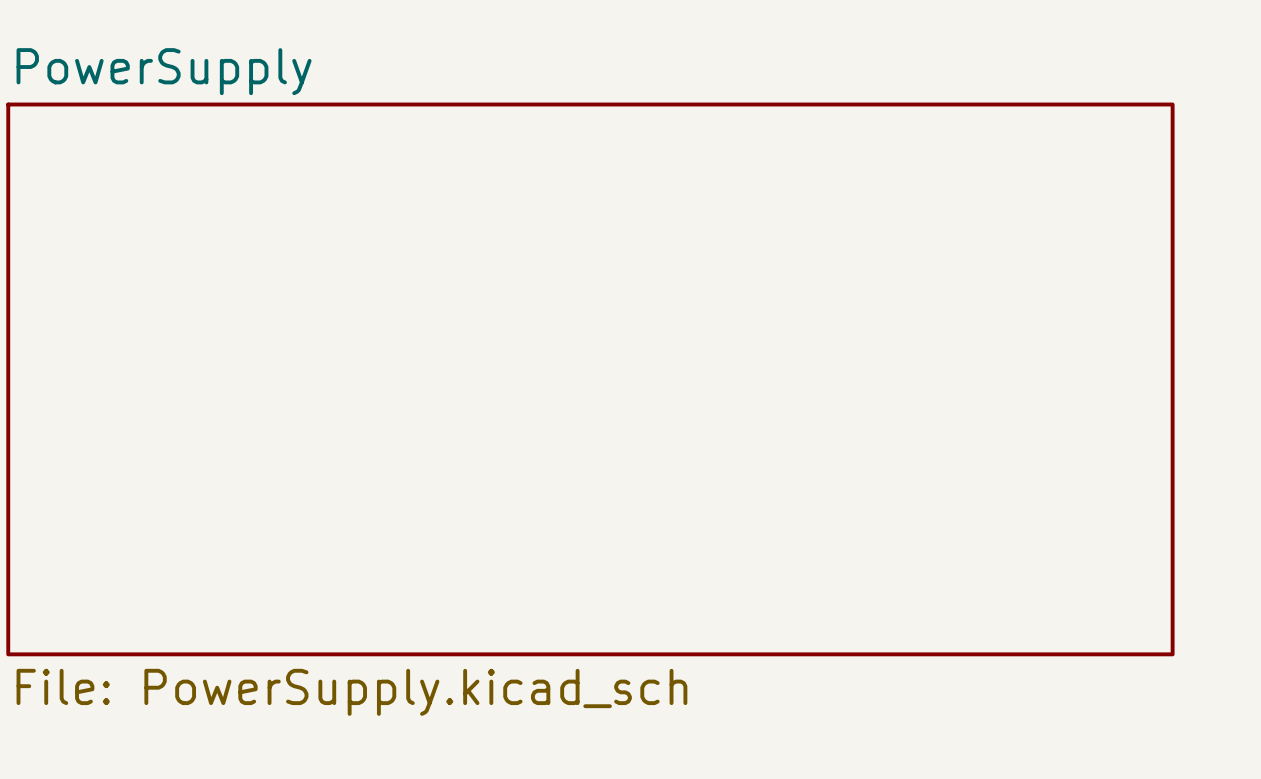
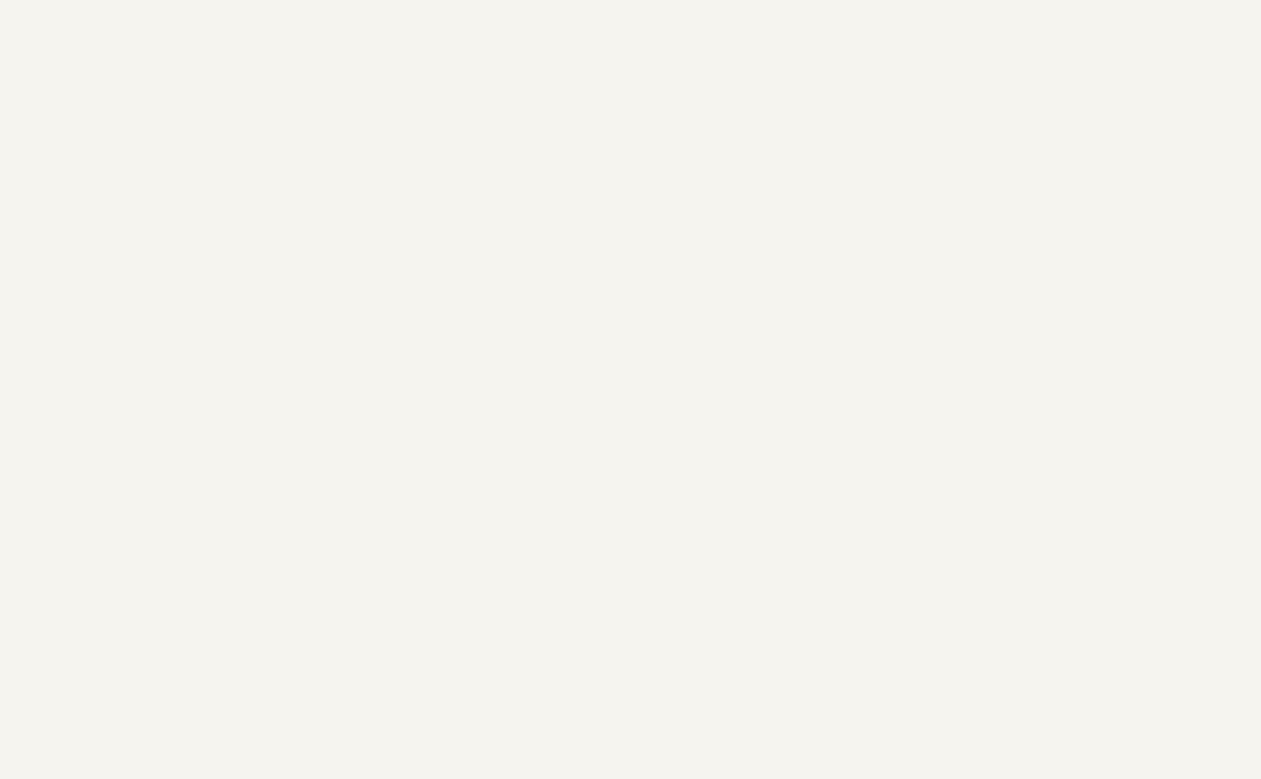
sheet PowerSupply: File: PowerSupply.kicad_sch (590, 379) -> none

